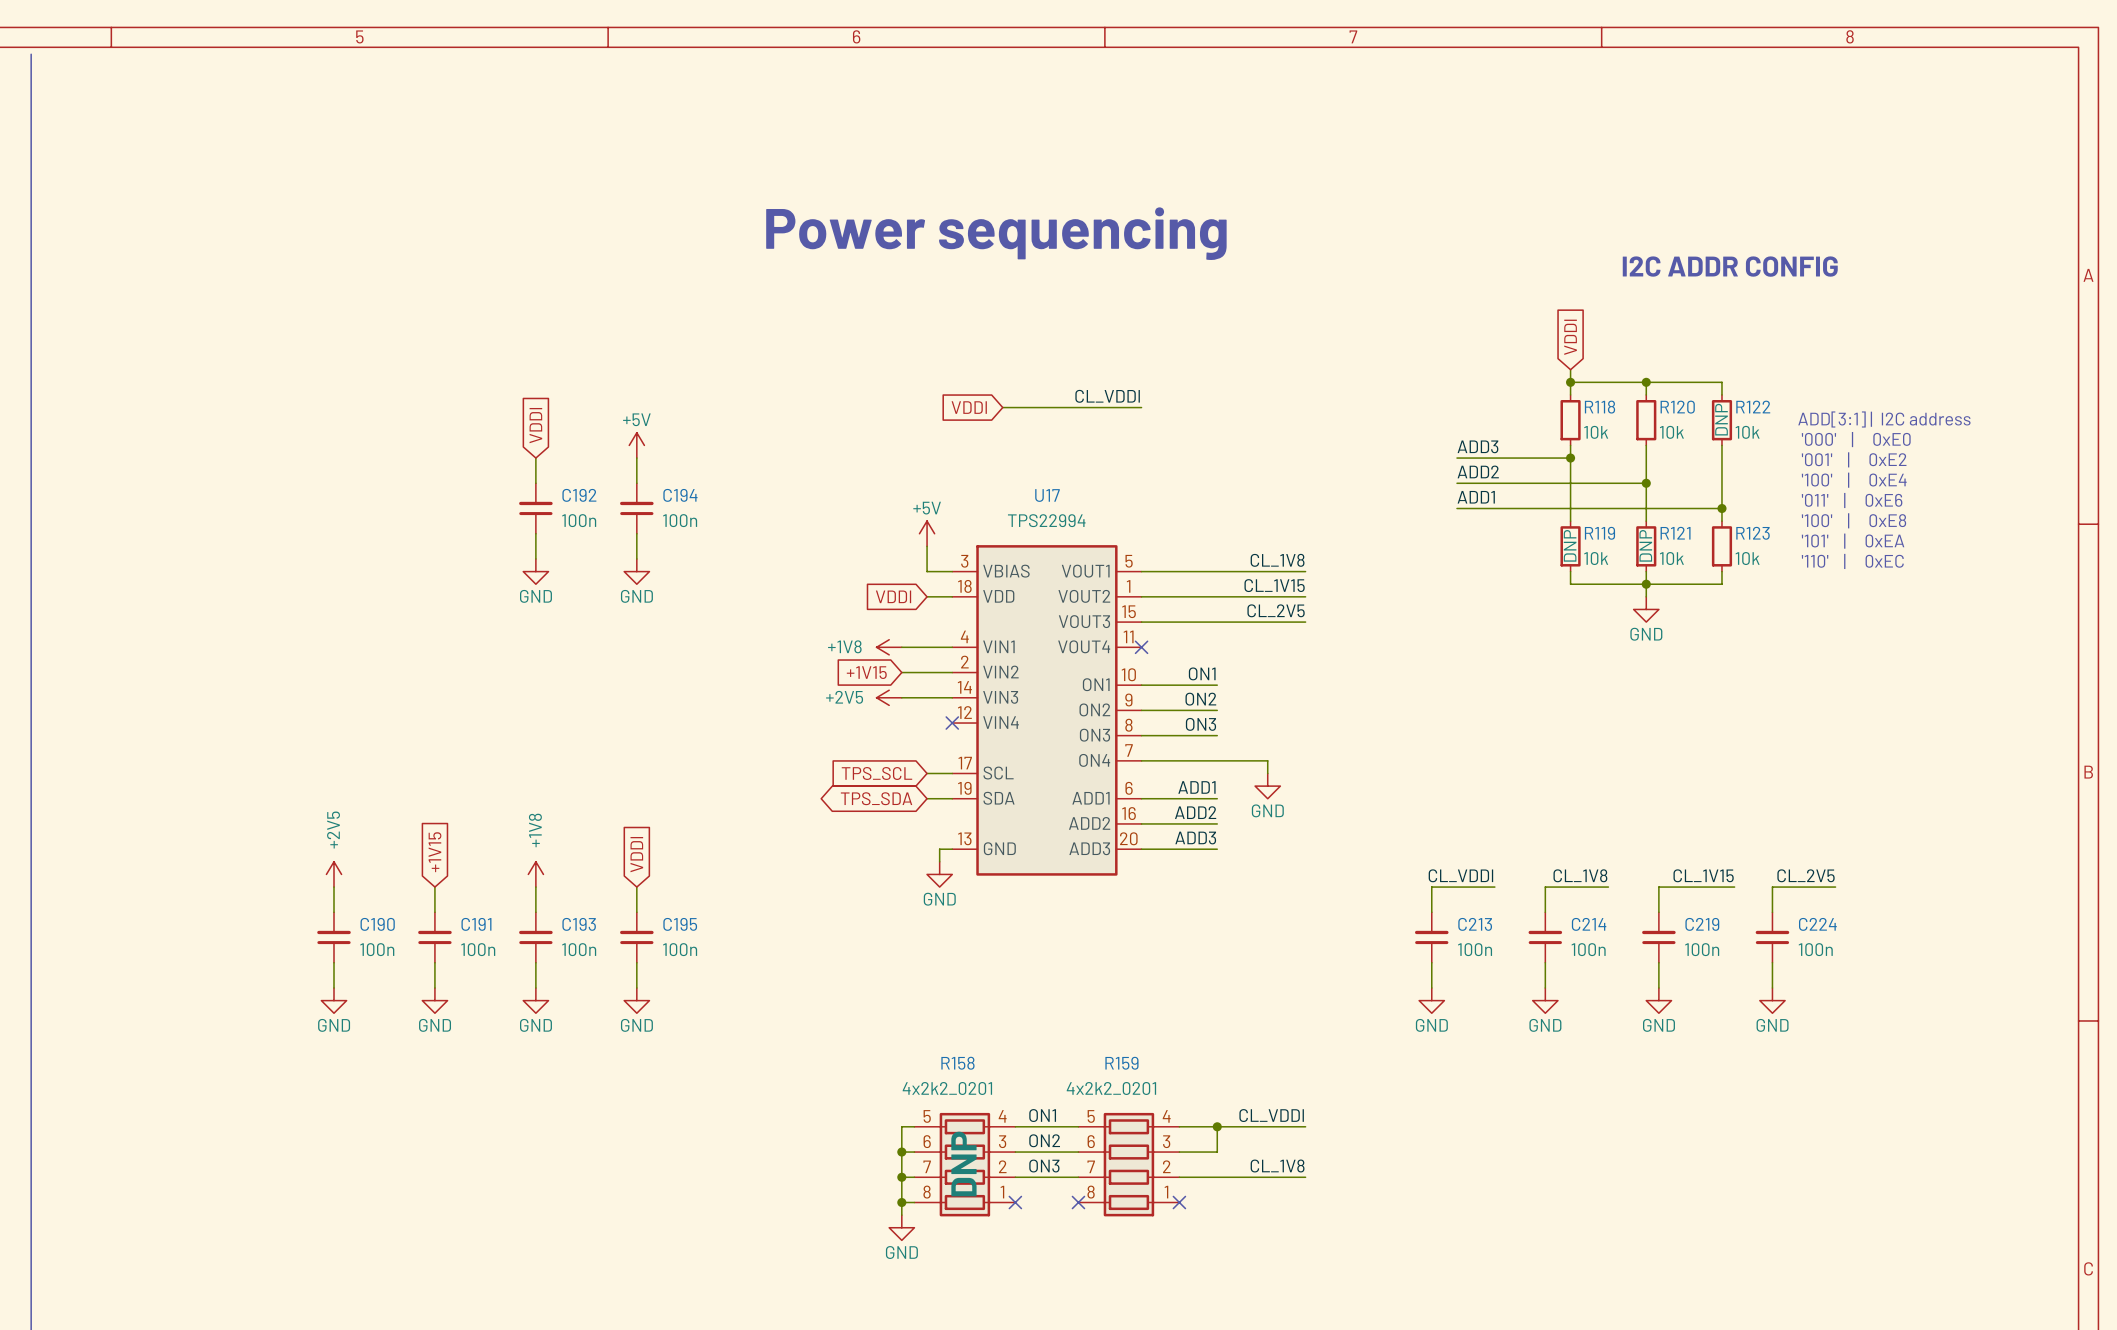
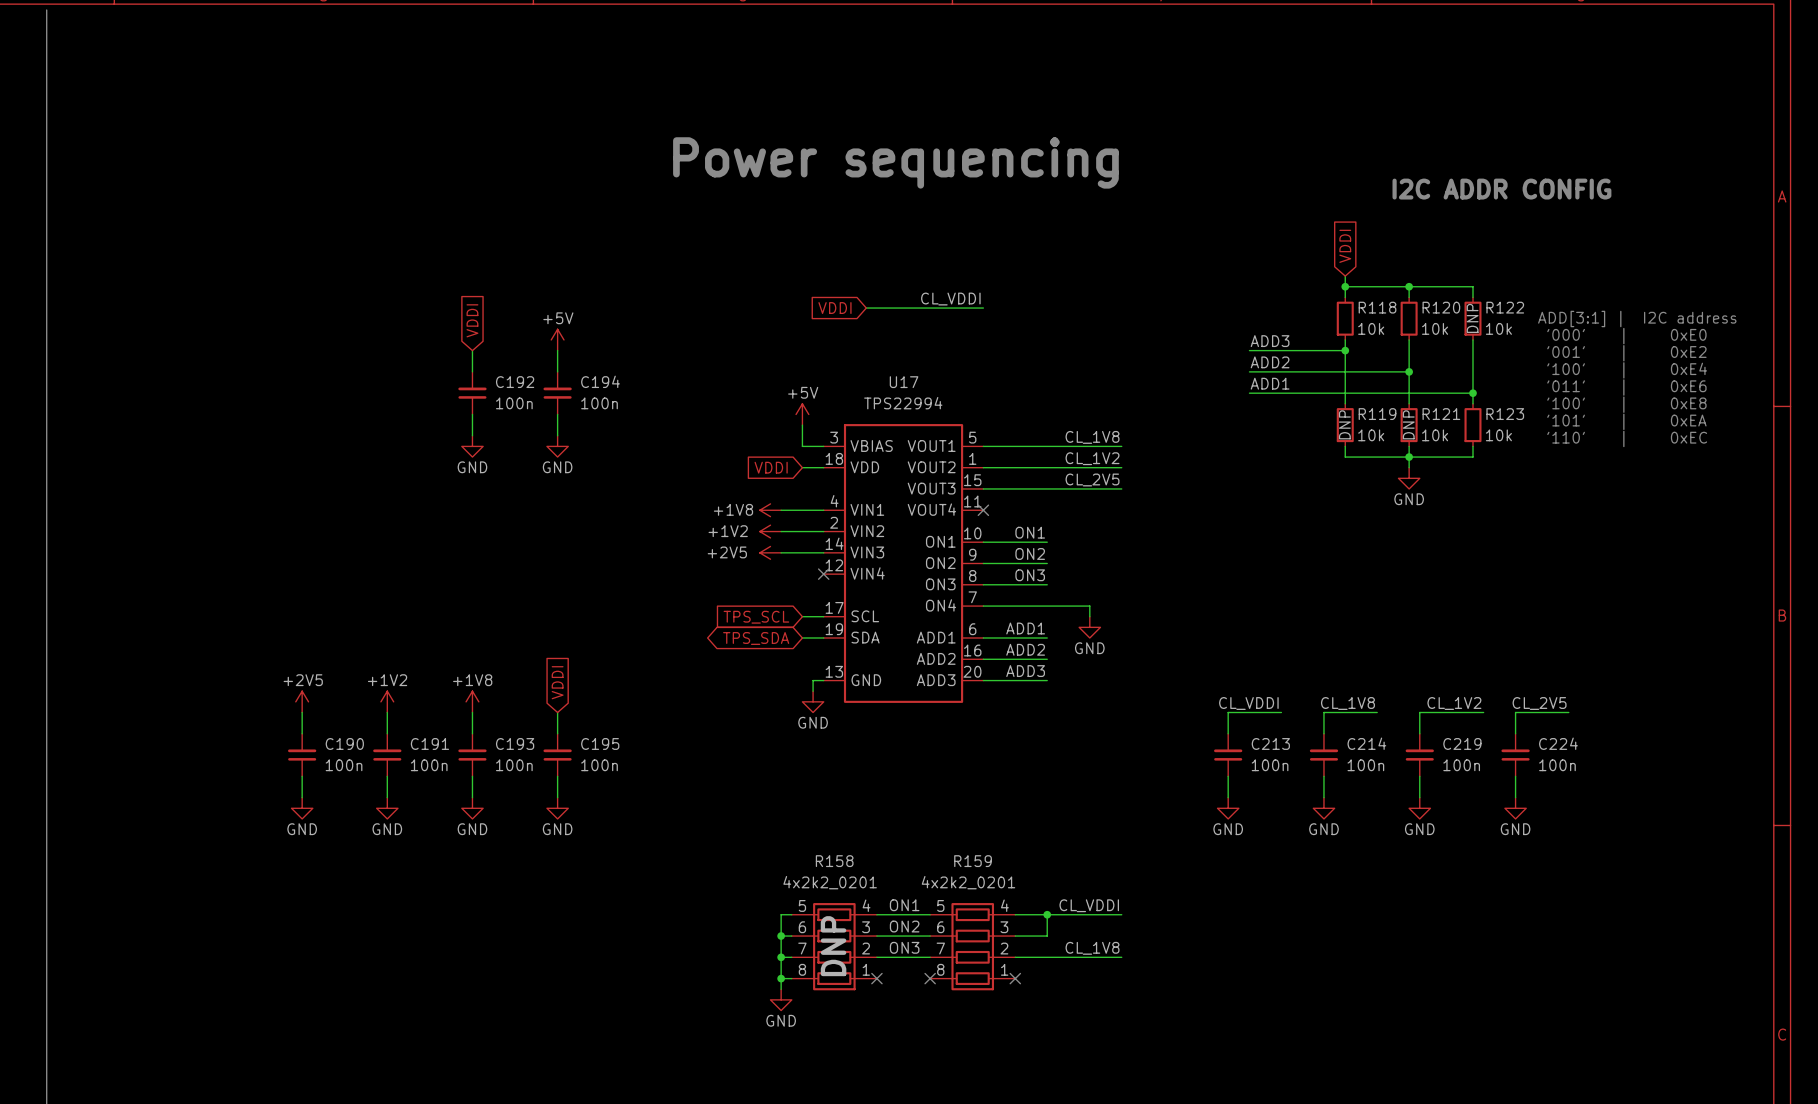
label: CL_1V15 (1274, 585) -> CL_1V2 (1092, 458)
global label: +1V15 (866, 672) -> none
power symbol: none -> +1V2 (770, 531)
power symbol text rotation: 0° (333, 830) -> 90° clockwise (303, 680)
power symbol text rotation: 0° (535, 830) -> 90° clockwise (472, 680)
global label: +1V15 (435, 852) -> none
power symbol: none -> +1V2 (387, 701)
label: CL_1V15 (1703, 875) -> CL_1V2 (1454, 703)

